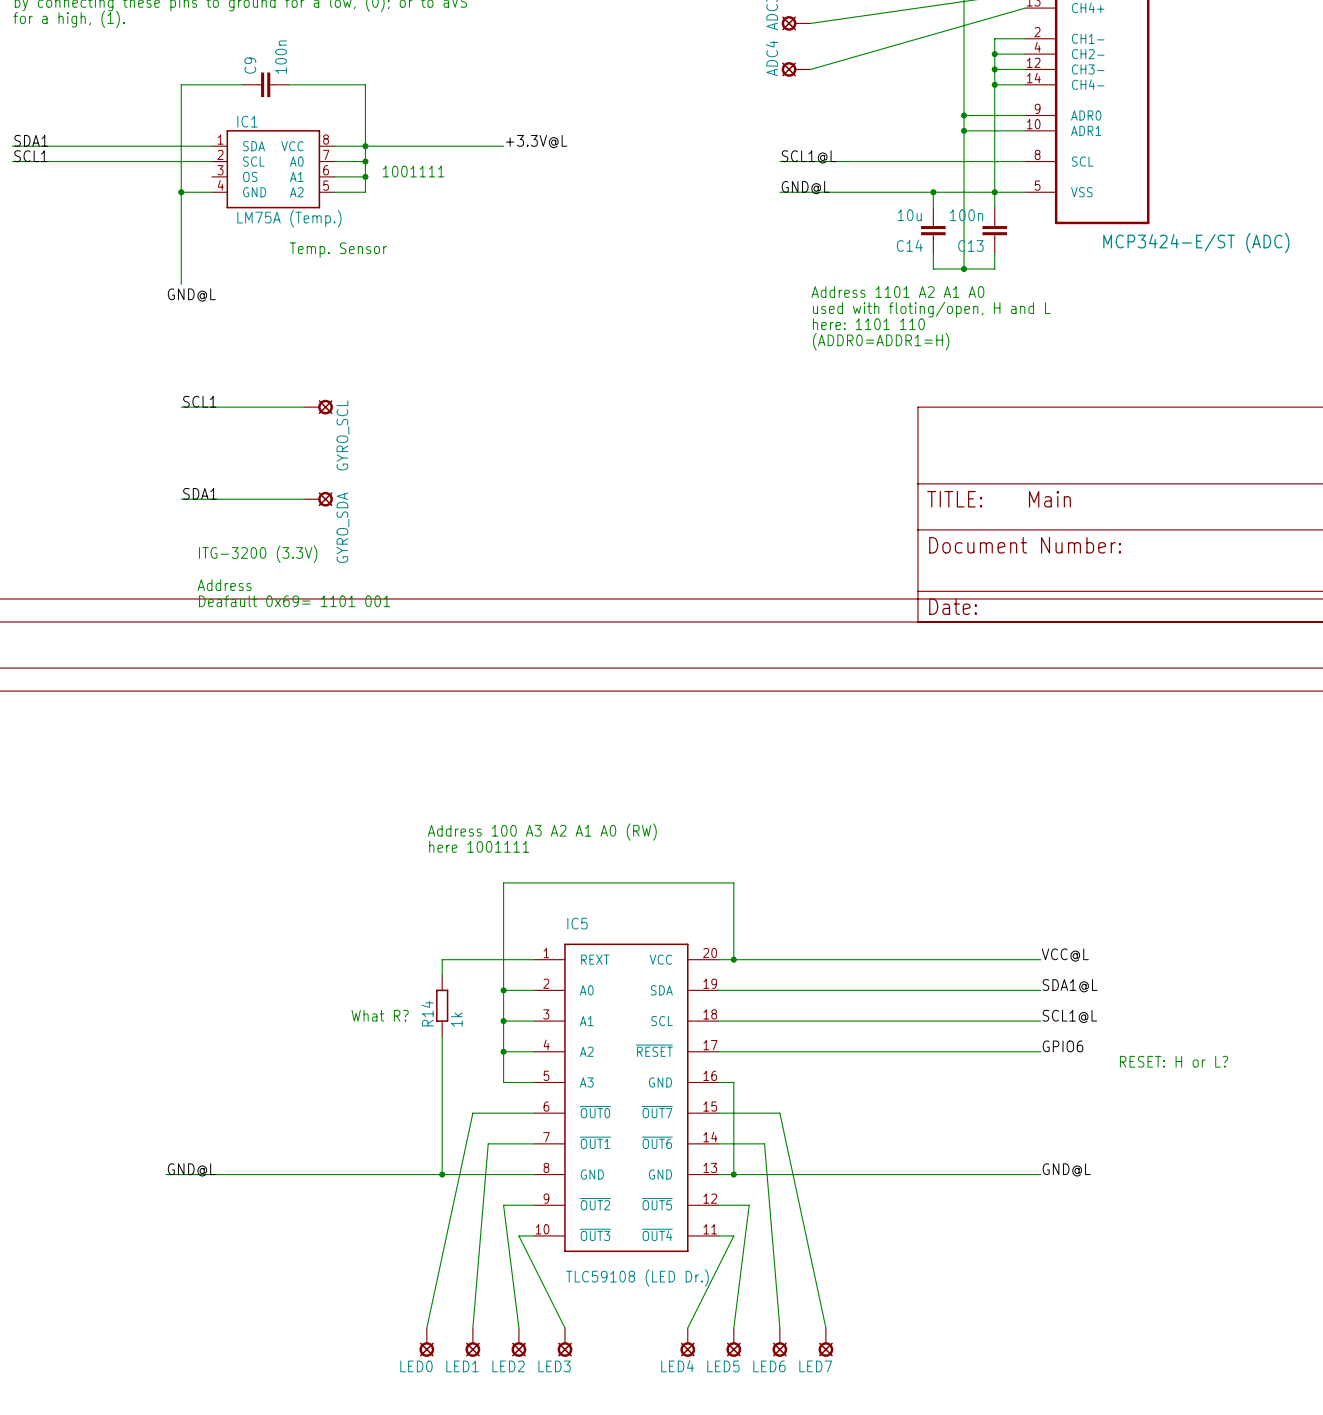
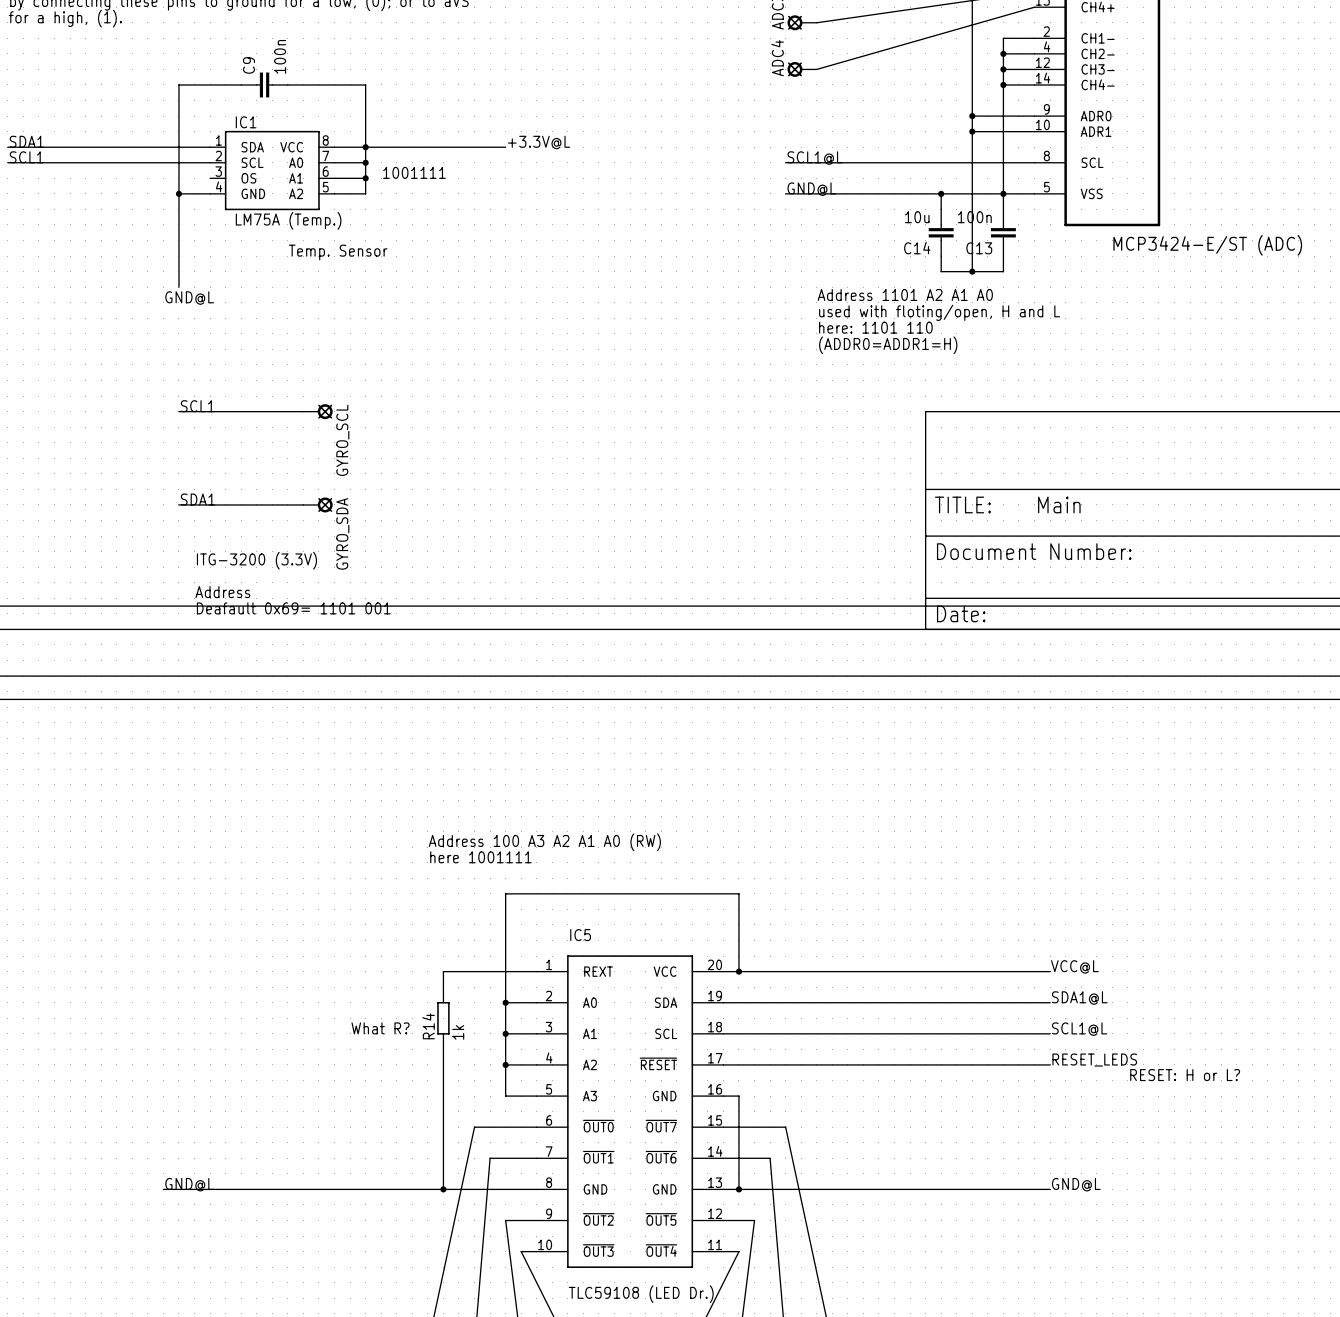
label: GPIO6 (1062, 1046) -> RESET_LEDS (1094, 1060)

